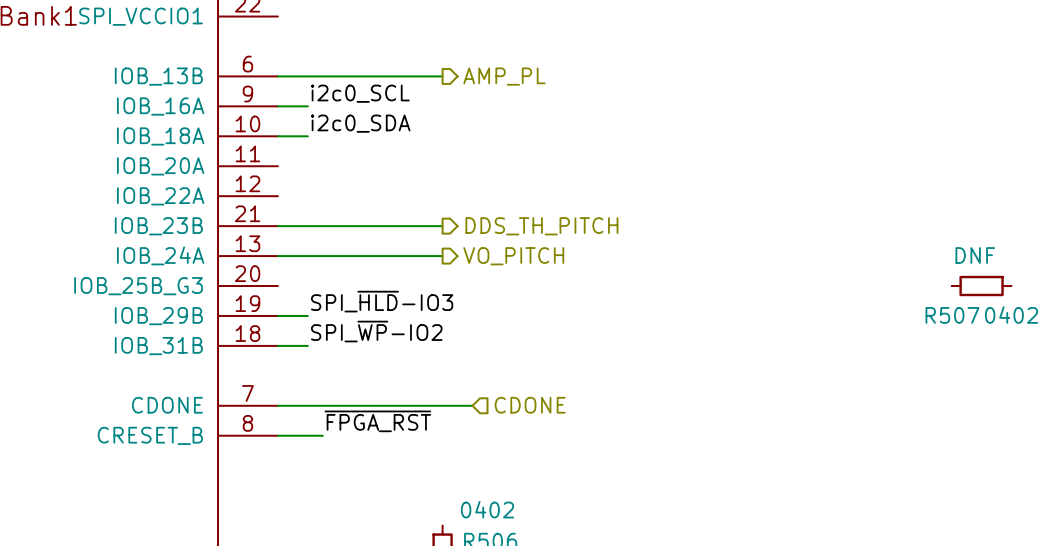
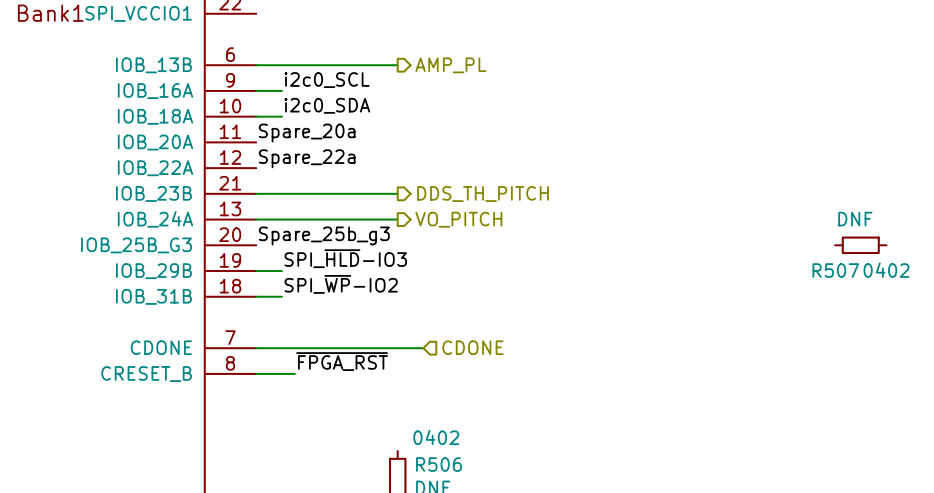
label: none -> Spare_20a (307, 133)
label: none -> Spare_22a (307, 158)
label: none -> Spare_25b_g3 (324, 235)

